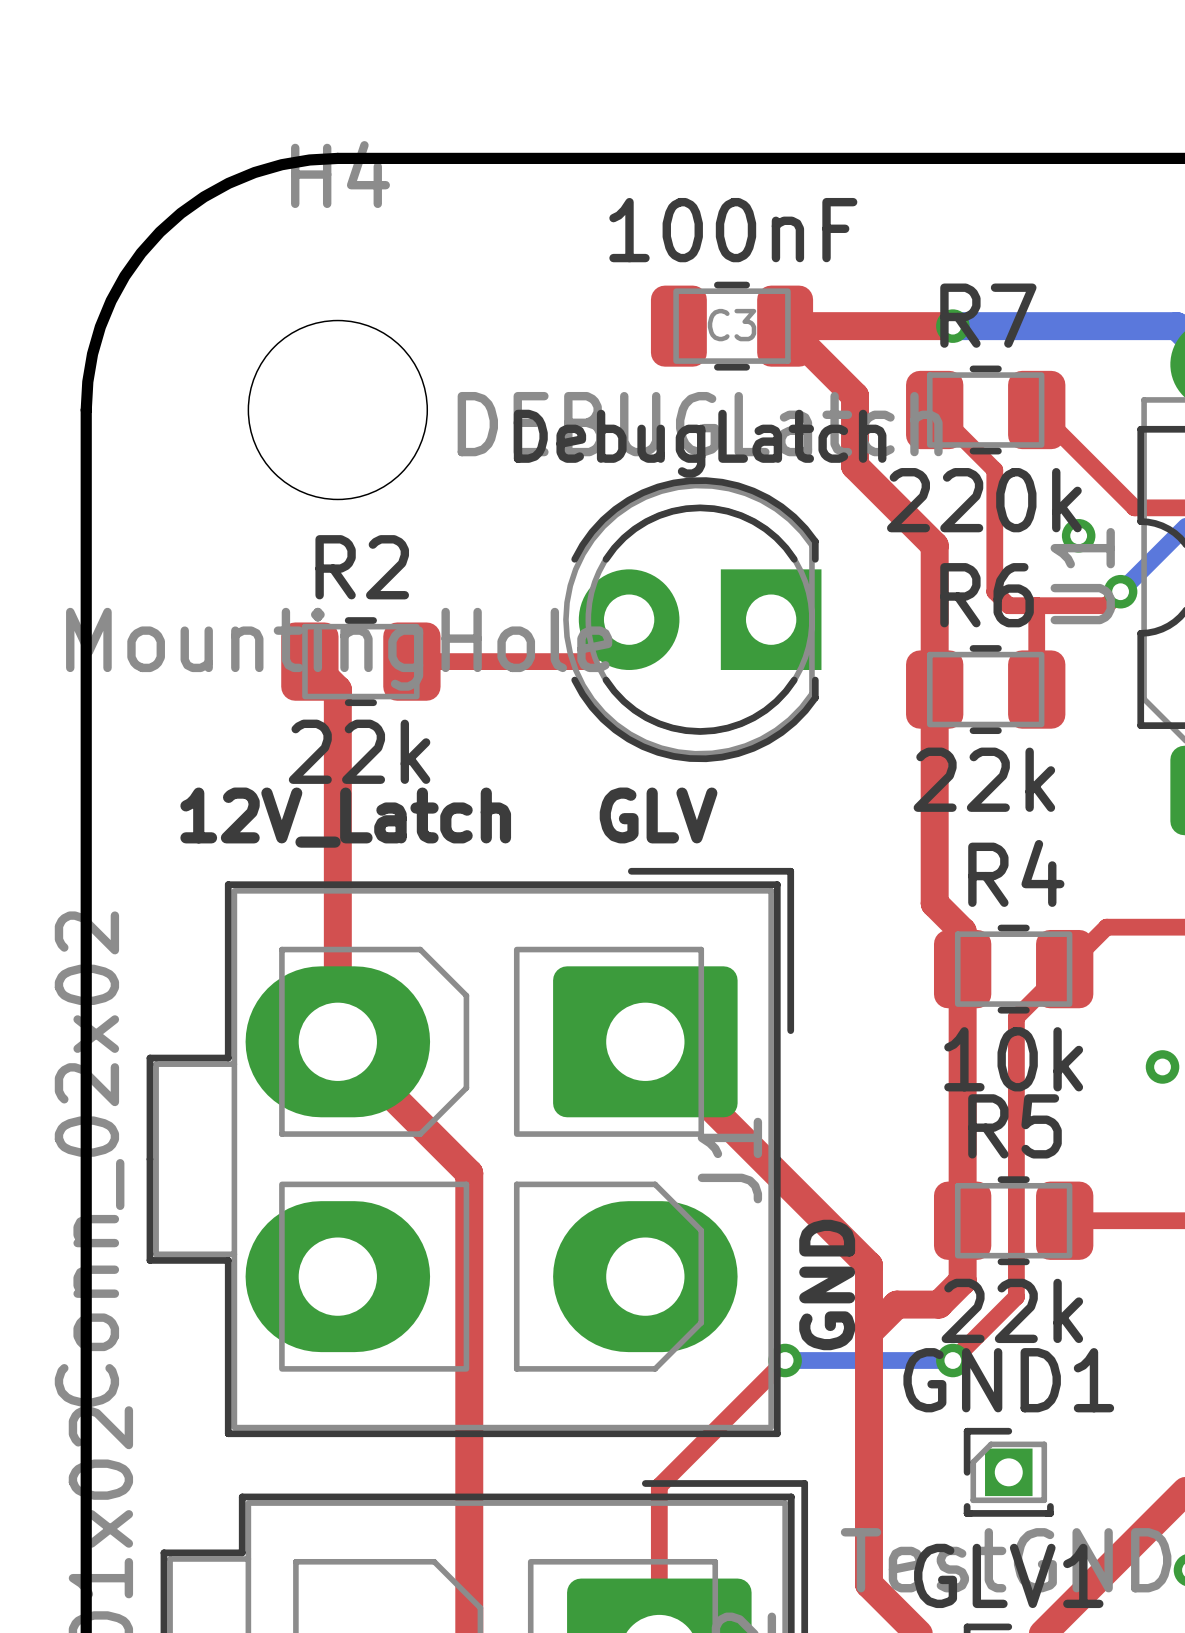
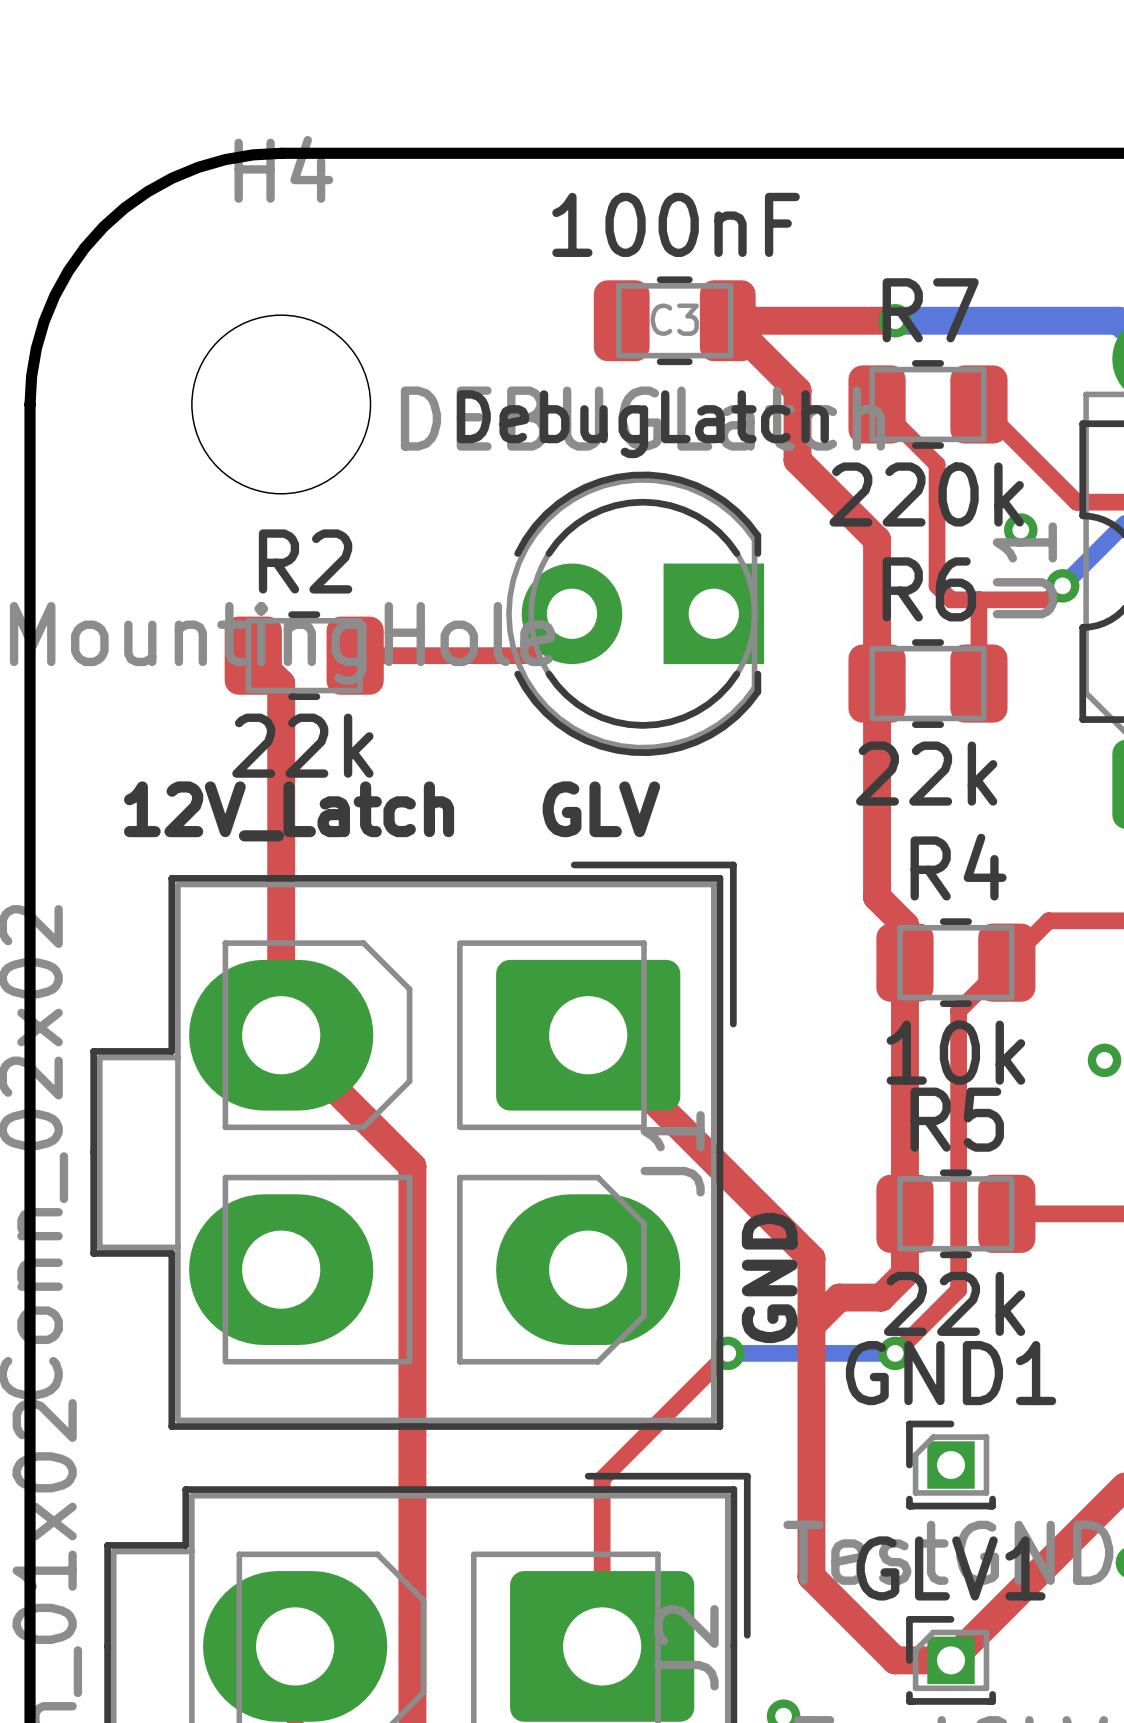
DebugLatch name position: DebugLatch (700, 443) -> DebugLatch (642, 424)

